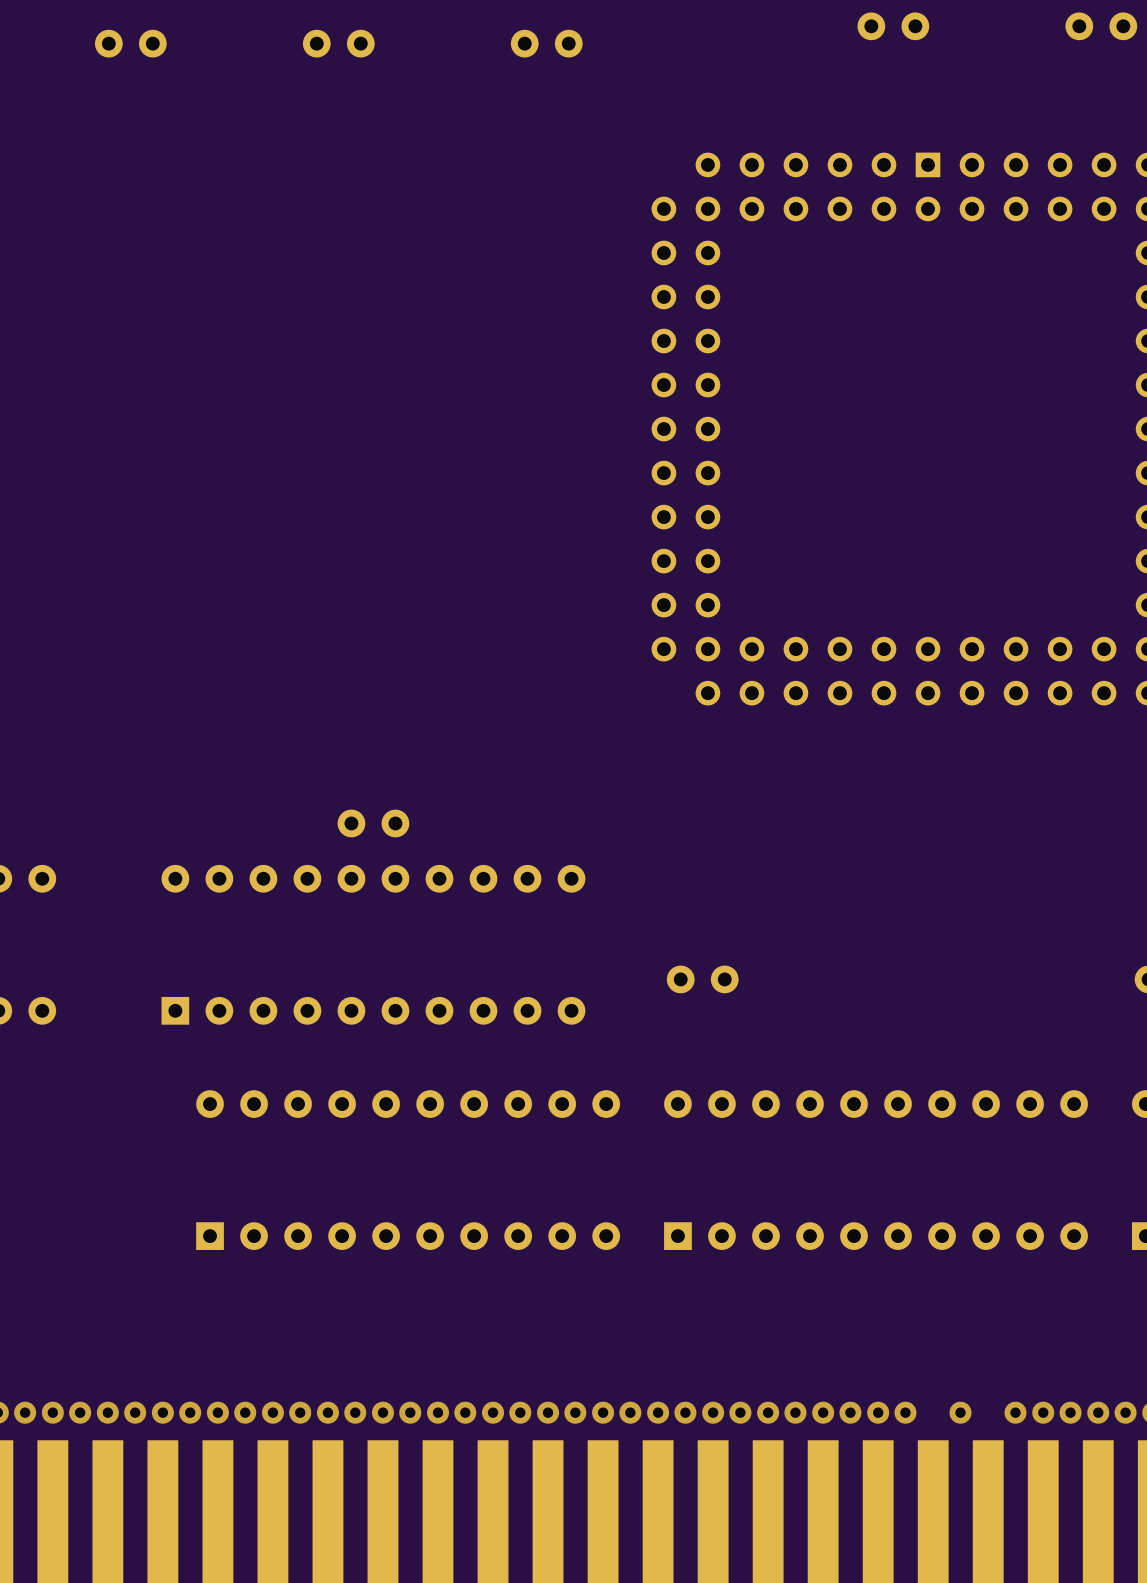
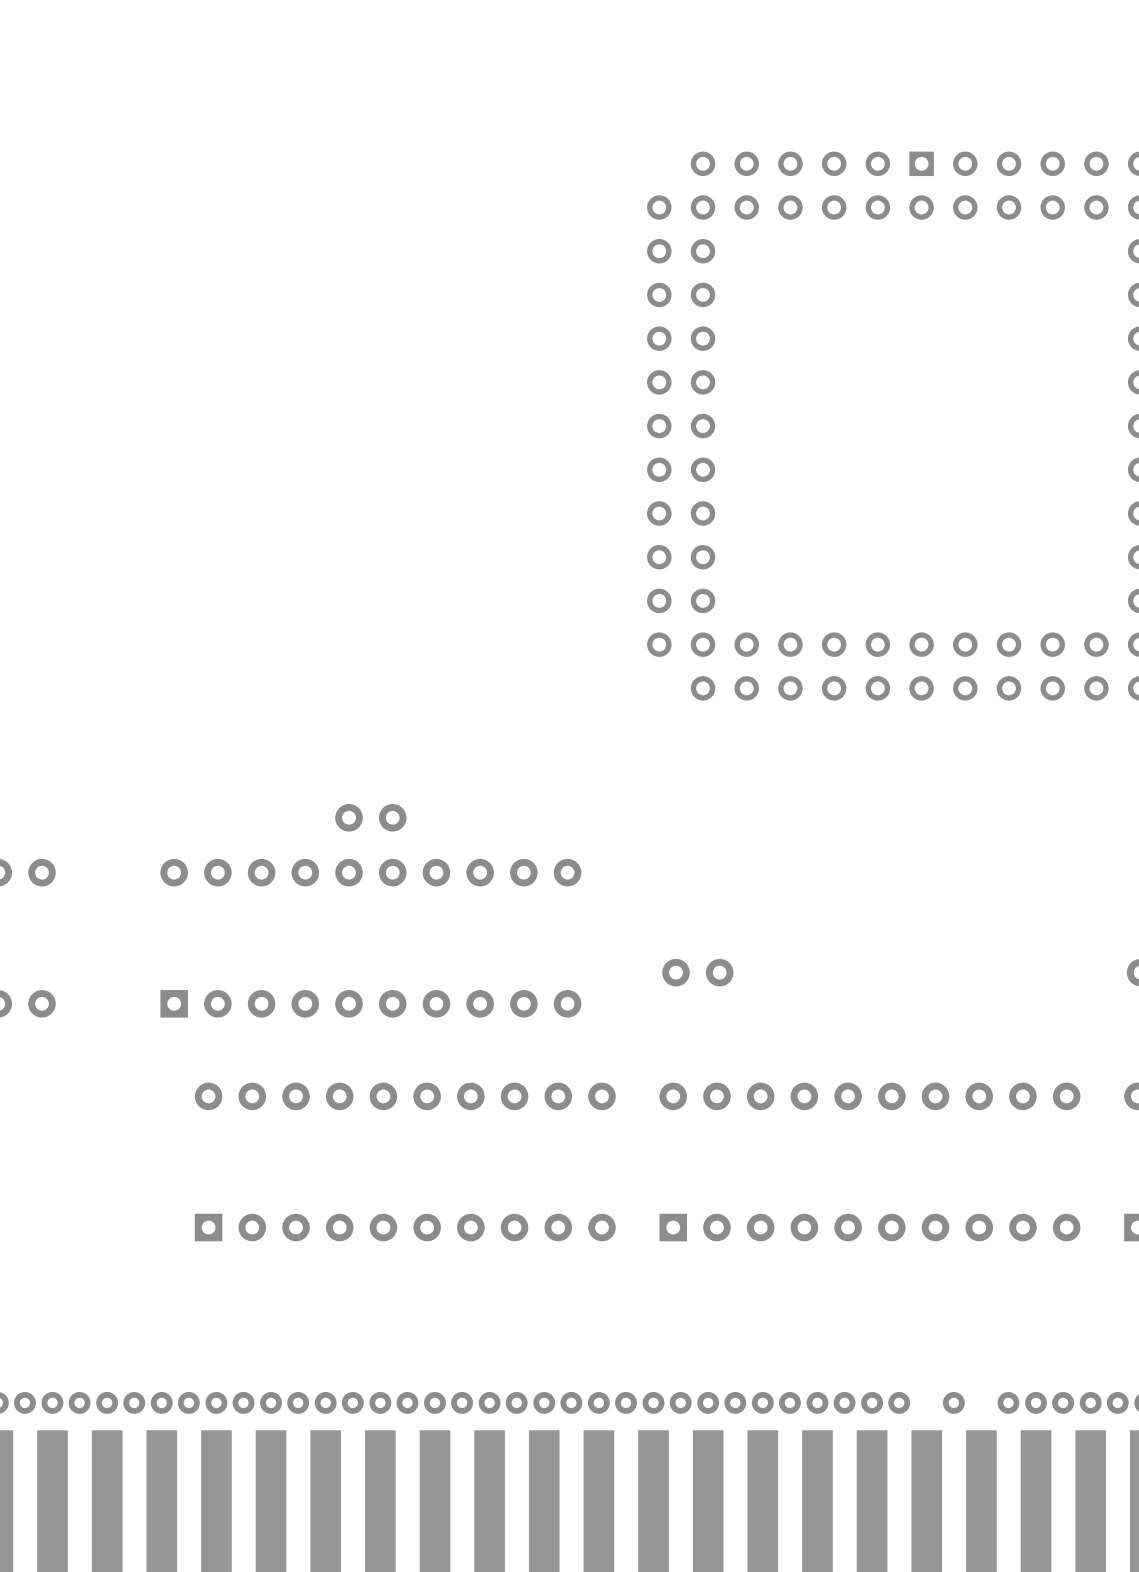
part: (893, 26) -> none
part: (1101, 26) -> none
part: (130, 43) -> none
part: (338, 43) -> none
part: (546, 43) -> none

